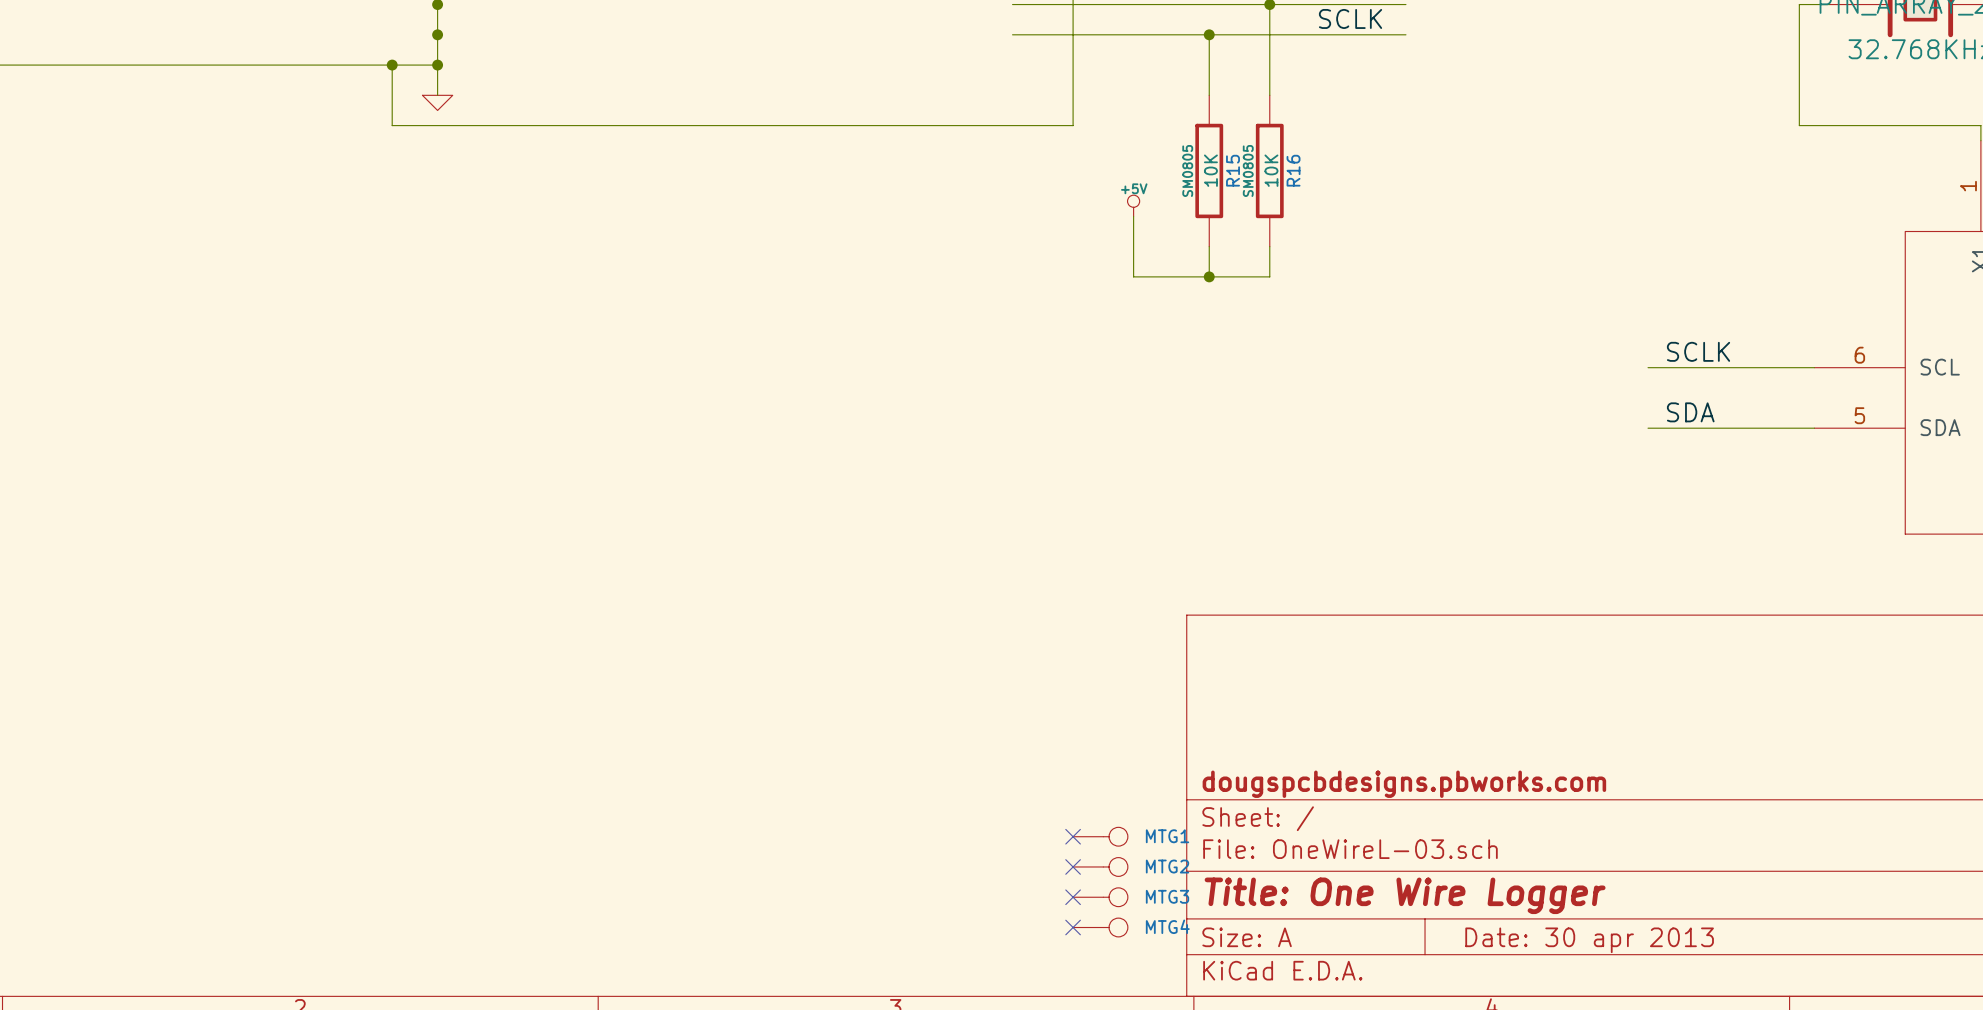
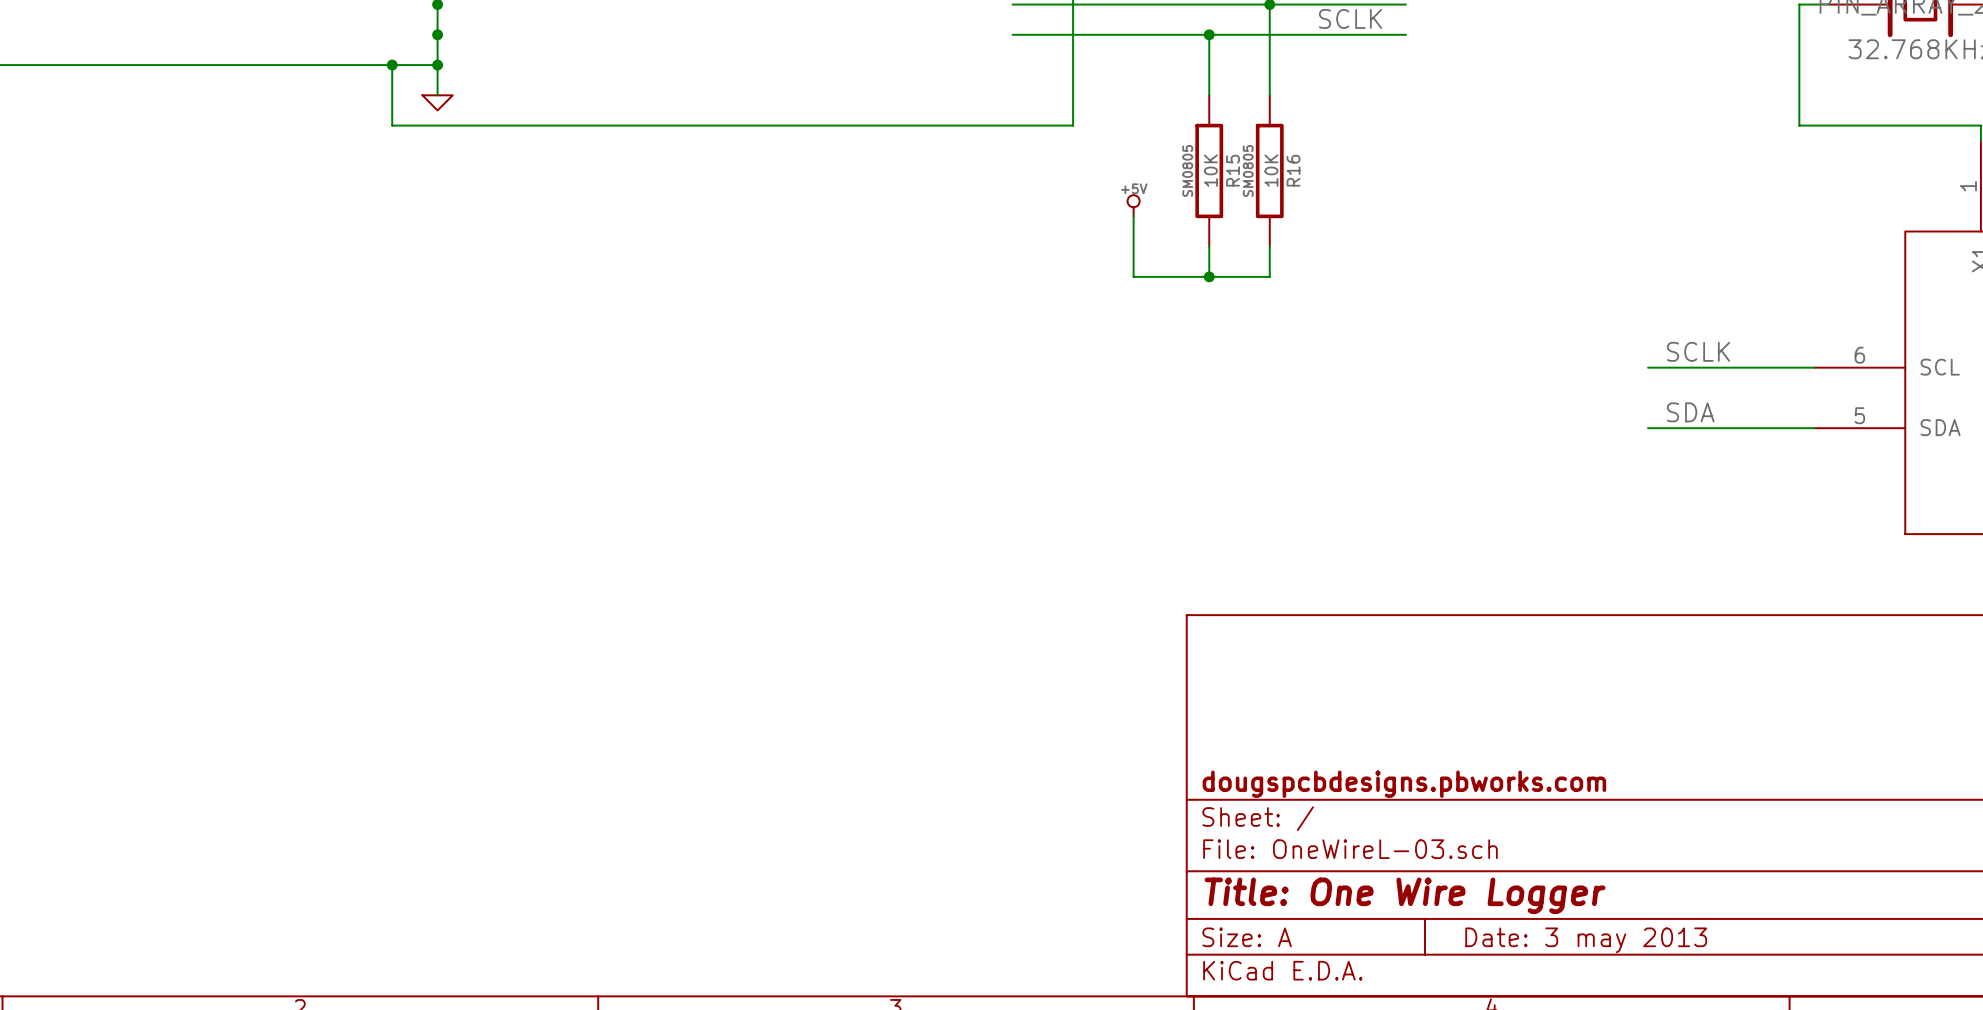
no-connect mark: (1073, 836) -> none
MTG1: (1100, 836) -> none
no-connect mark: (1073, 866) -> none
MTG2: (1100, 866) -> none
no-connect mark: (1073, 897) -> none
MTG3: (1100, 897) -> none
no-connect mark: (1073, 927) -> none
MTG4: (1100, 927) -> none
title block: Date: 30 apr 2013 (1589, 940) -> Date: 3 may 2013 (1586, 940)

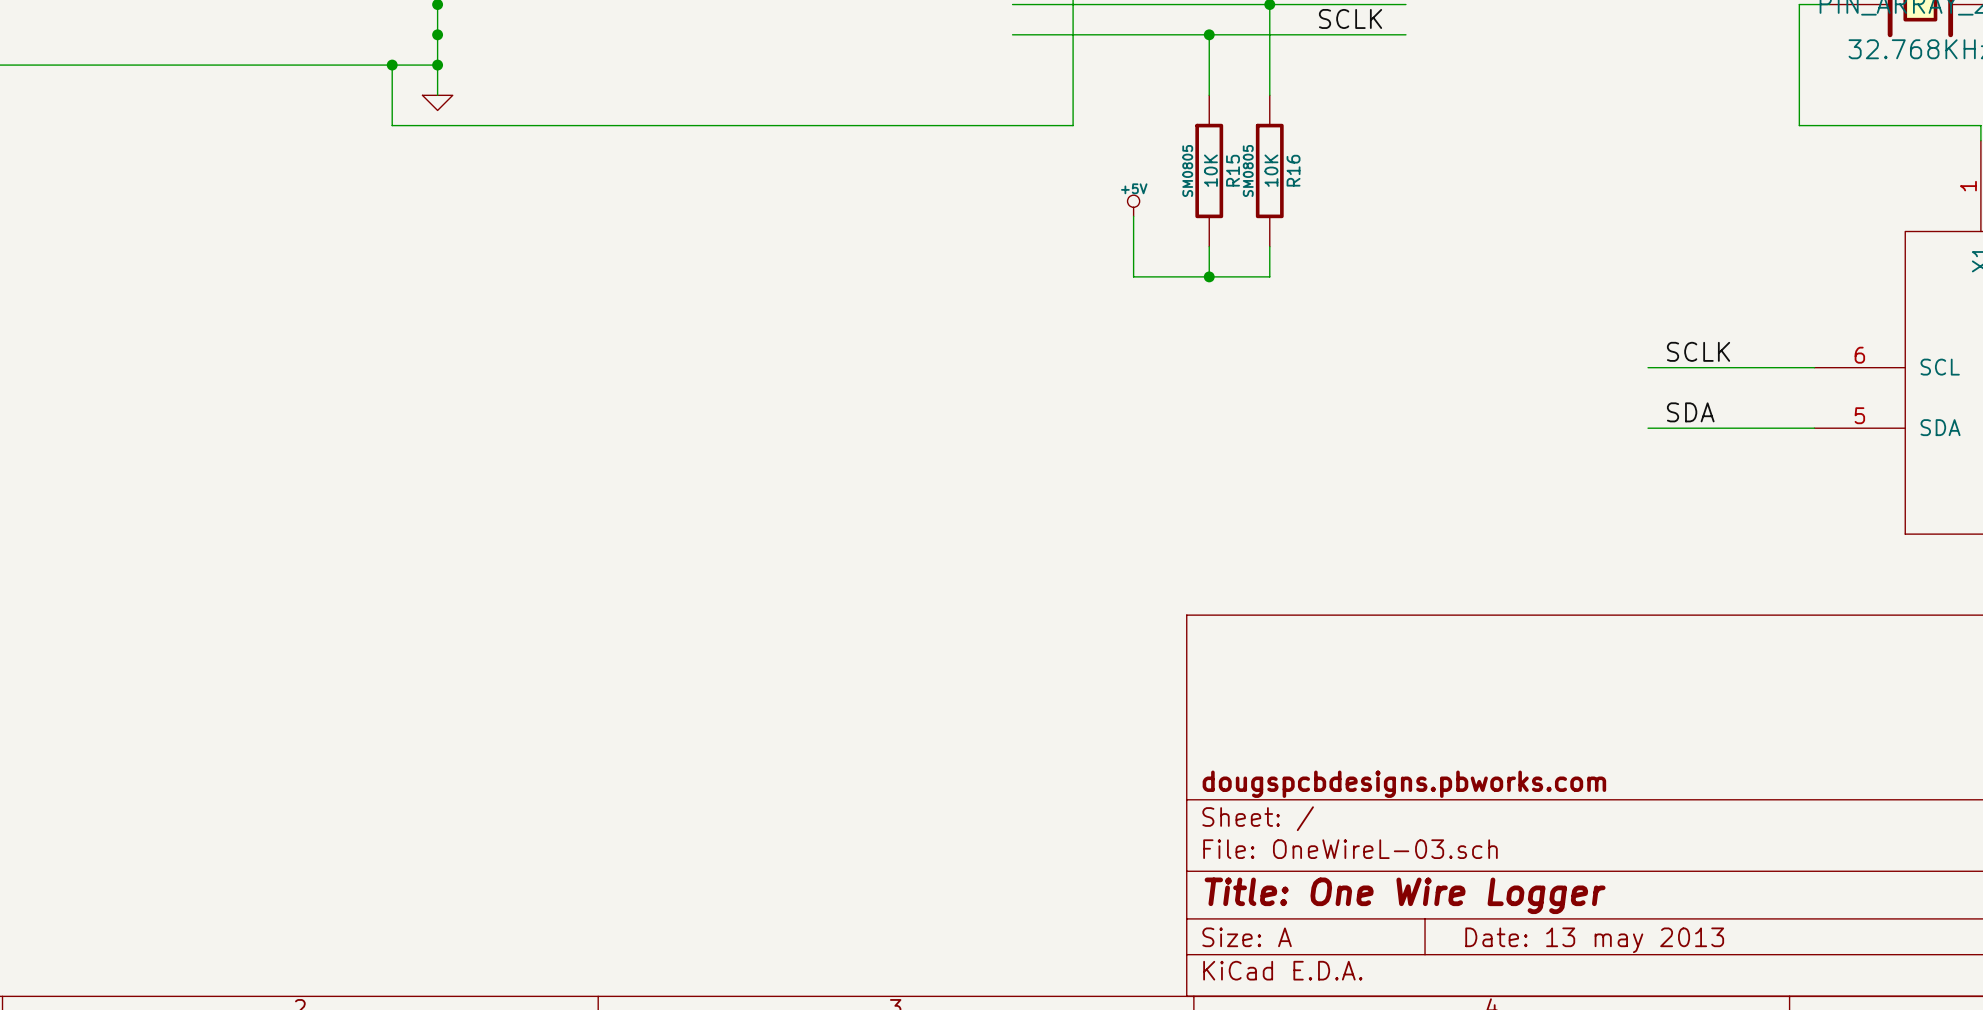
title block: Date: 3 may 2013 (1586, 940) -> Date: 13 may 2013 (1594, 940)

